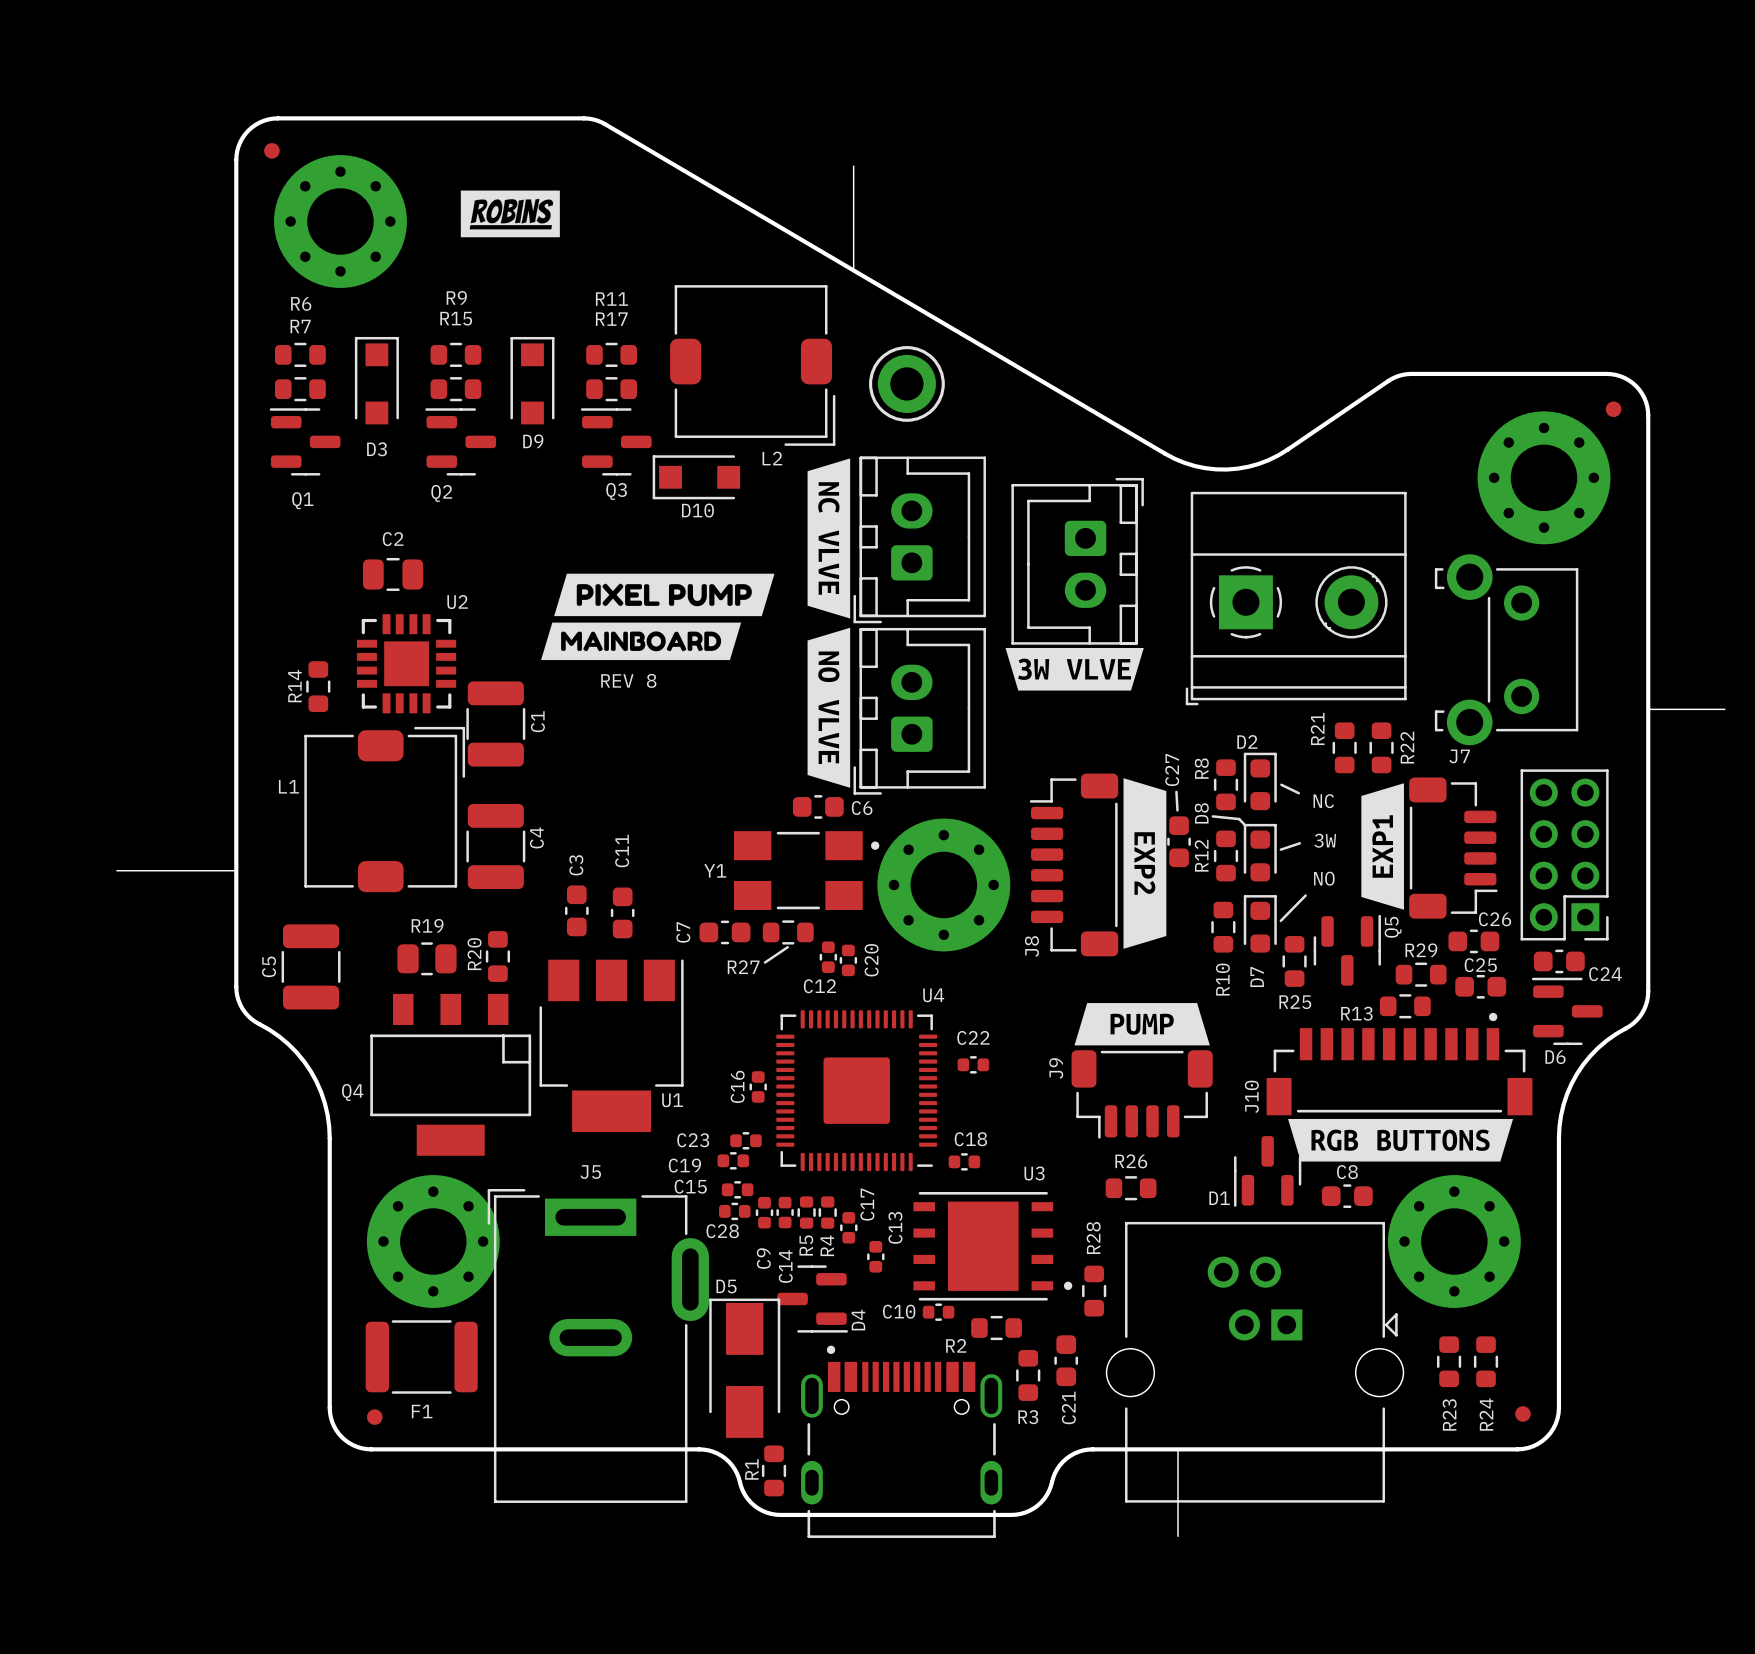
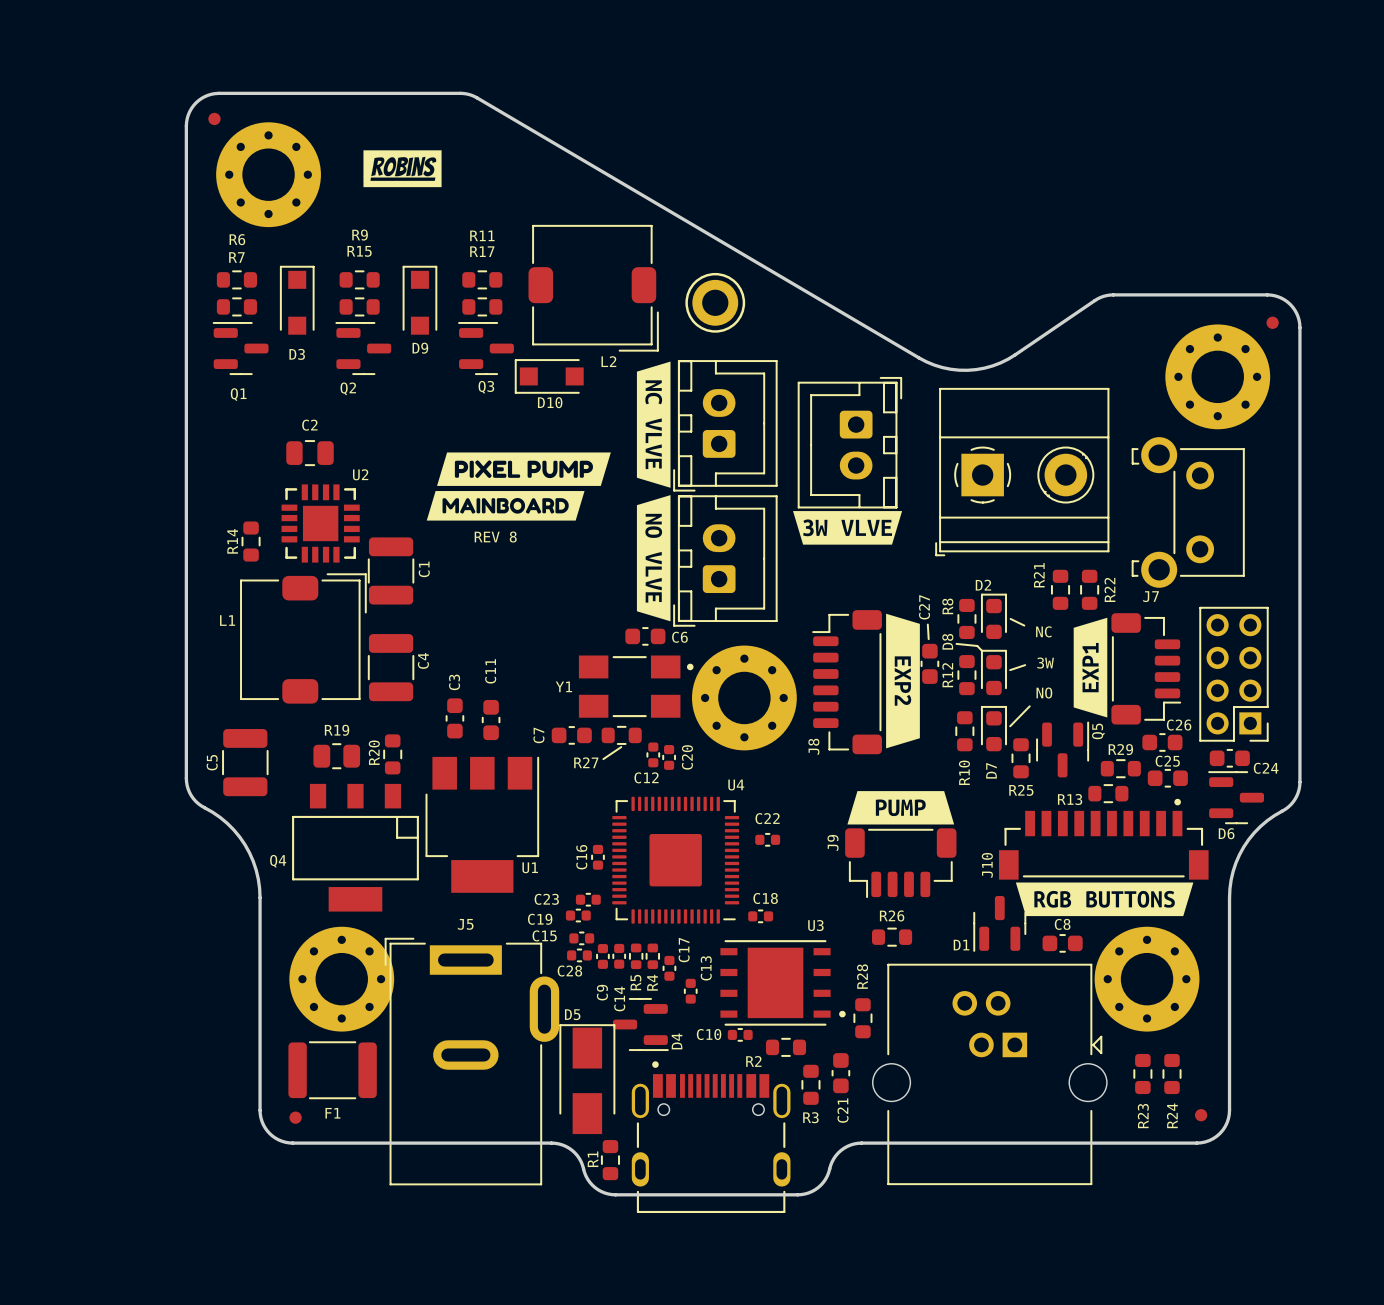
board edge: (853, 166) (853, 270) -> none
board edge: (1647, 709) (1724, 709) -> none
board edge: (116, 870) (236, 870) -> none
board edge: (1178, 1449) (1178, 1536) -> none

